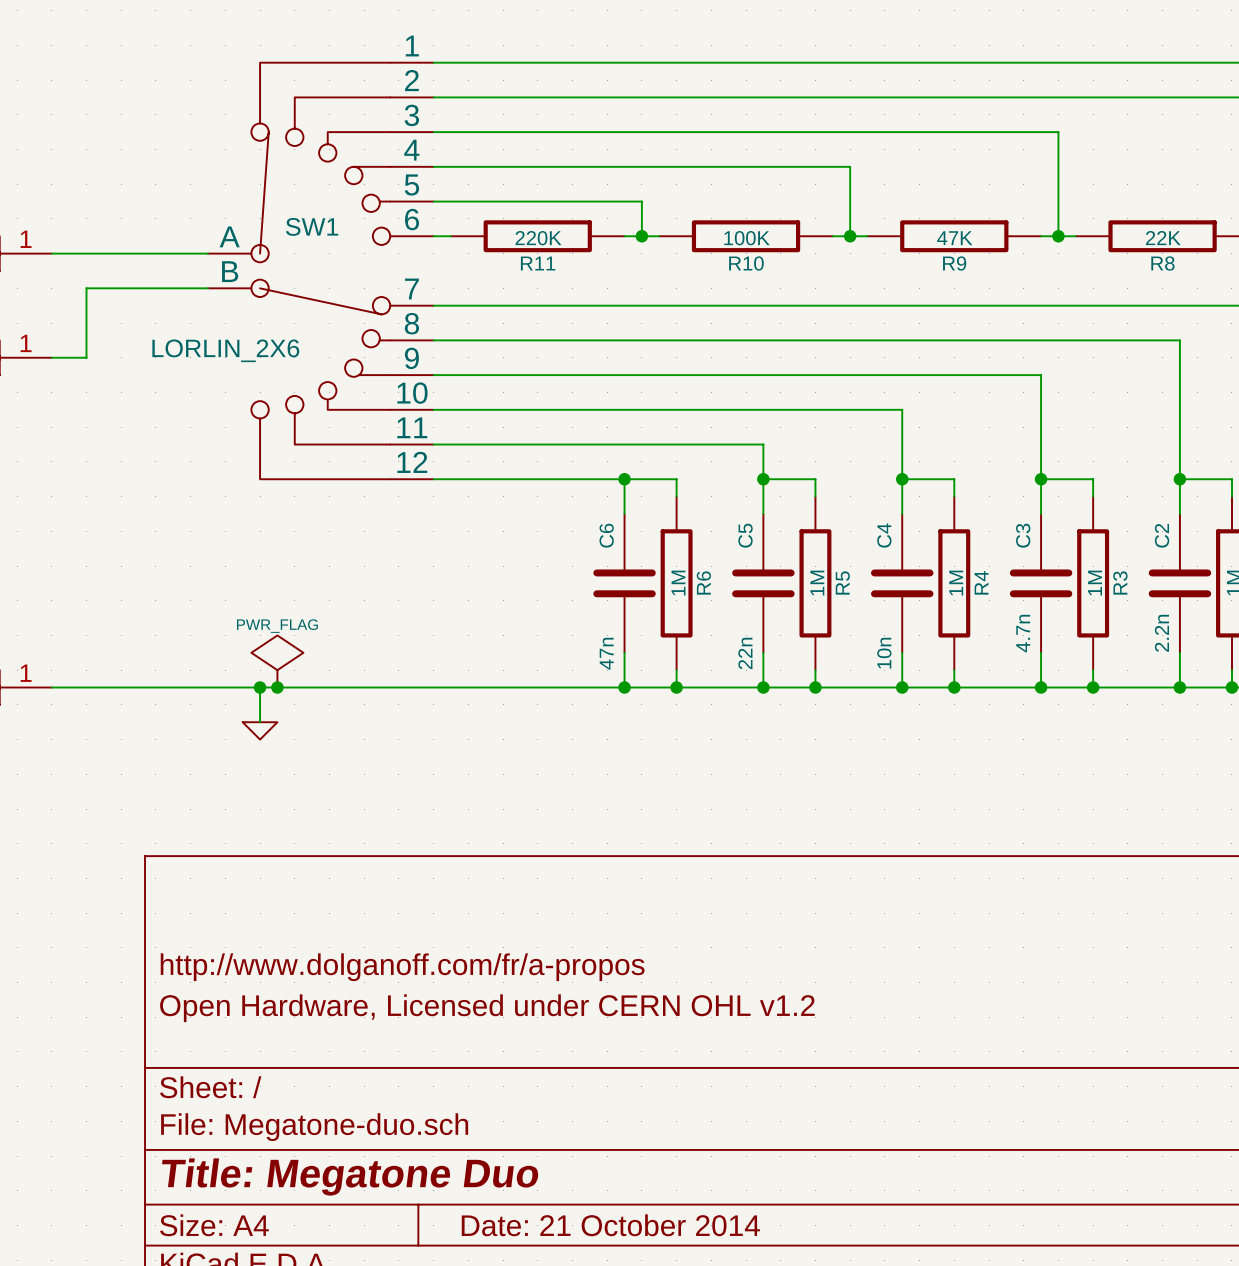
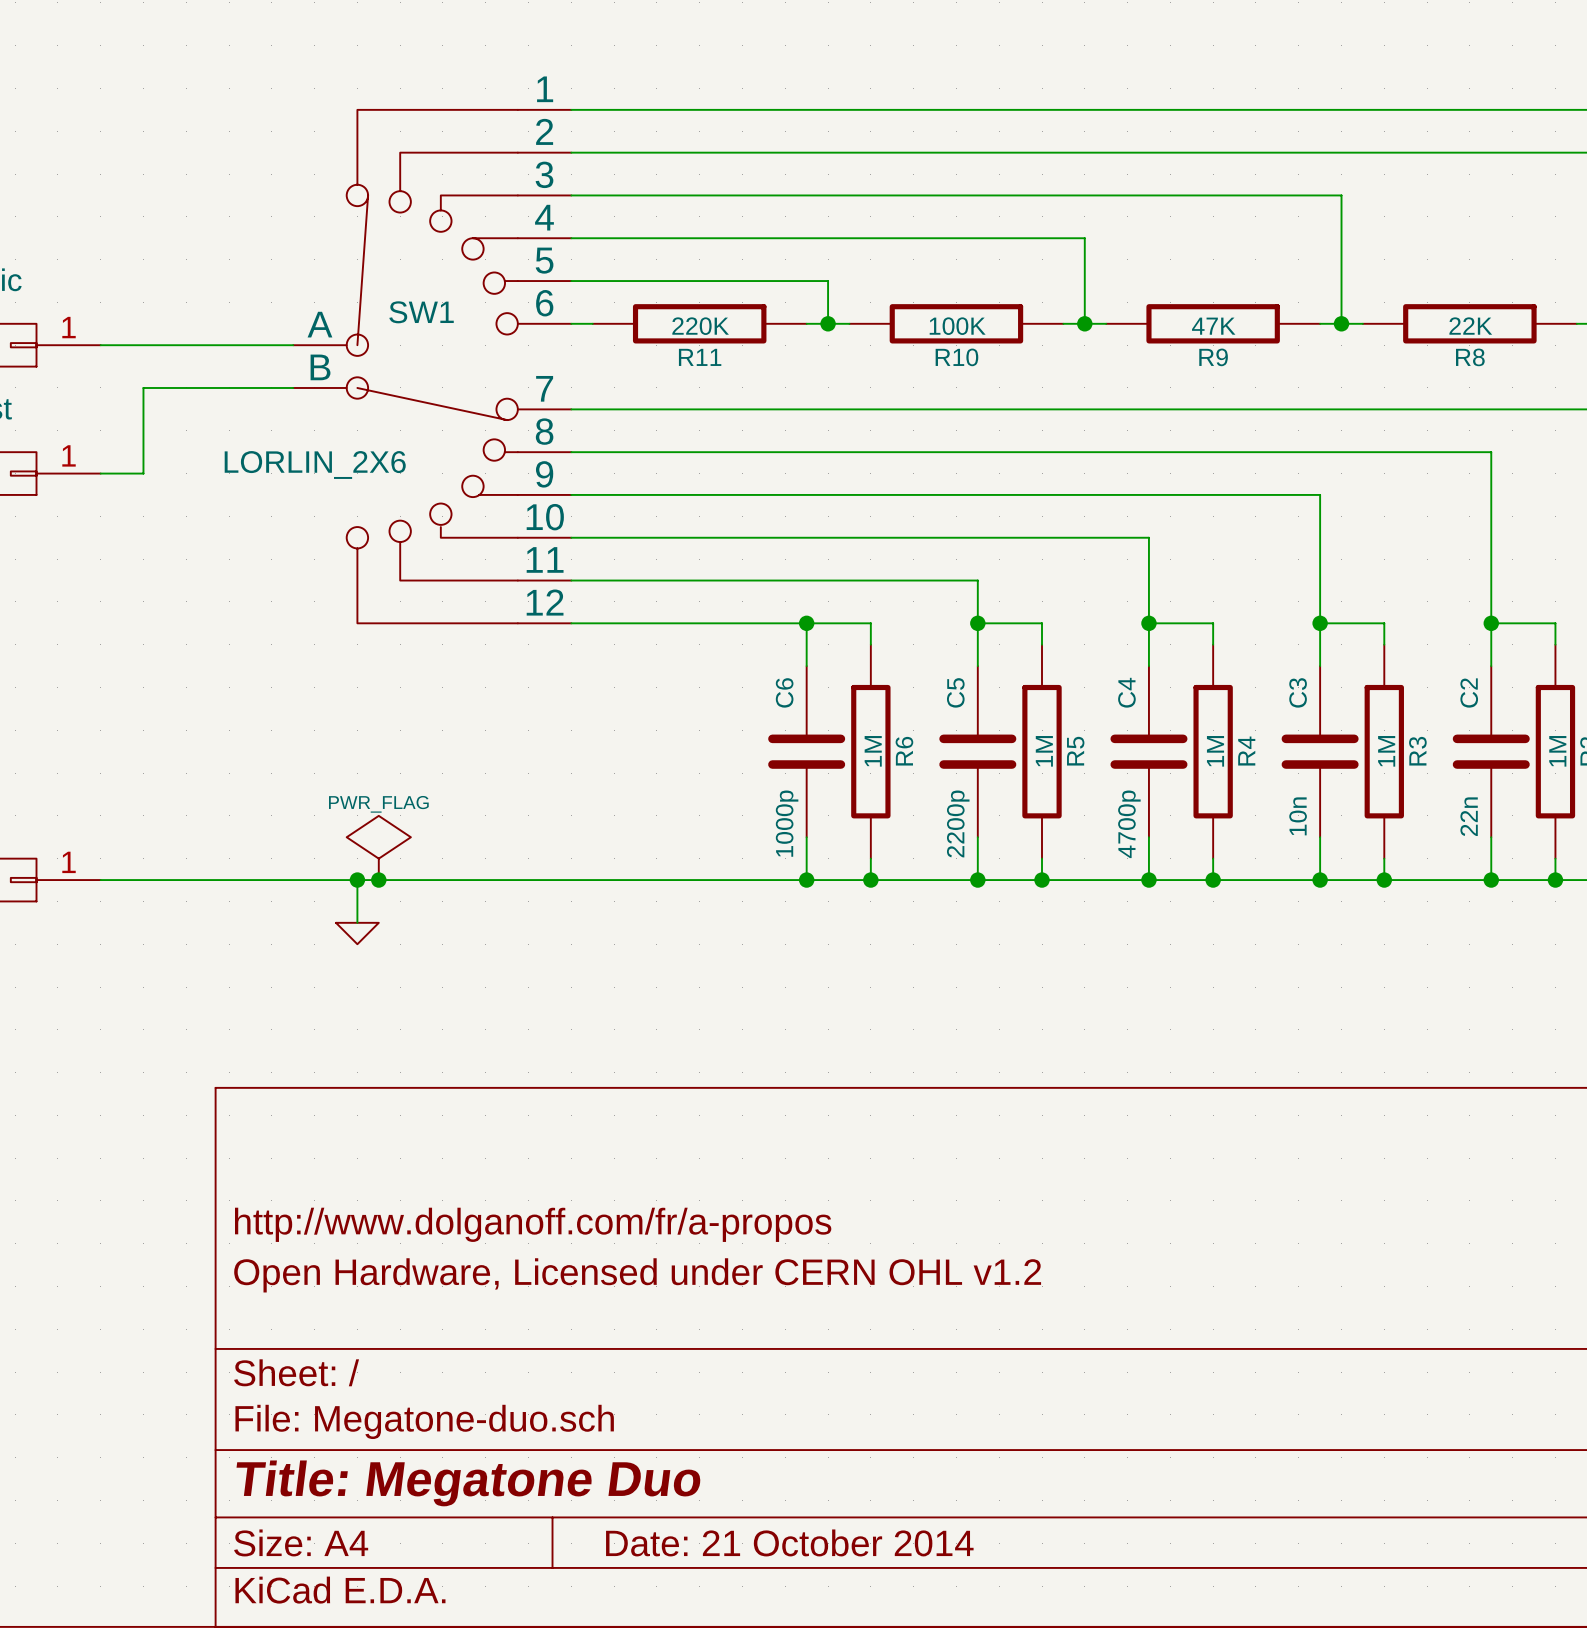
C3 value: 4.7n (1023, 633) -> 10n (1298, 816)
C2 value: 2.2n (1161, 633) -> 22n (1469, 816)
C6 value: 47n (606, 653) -> 1000p (787, 823)
C5 value: 22n (745, 653) -> 2200p (958, 823)
C4 value: 10n (884, 653) -> 4700p (1129, 824)

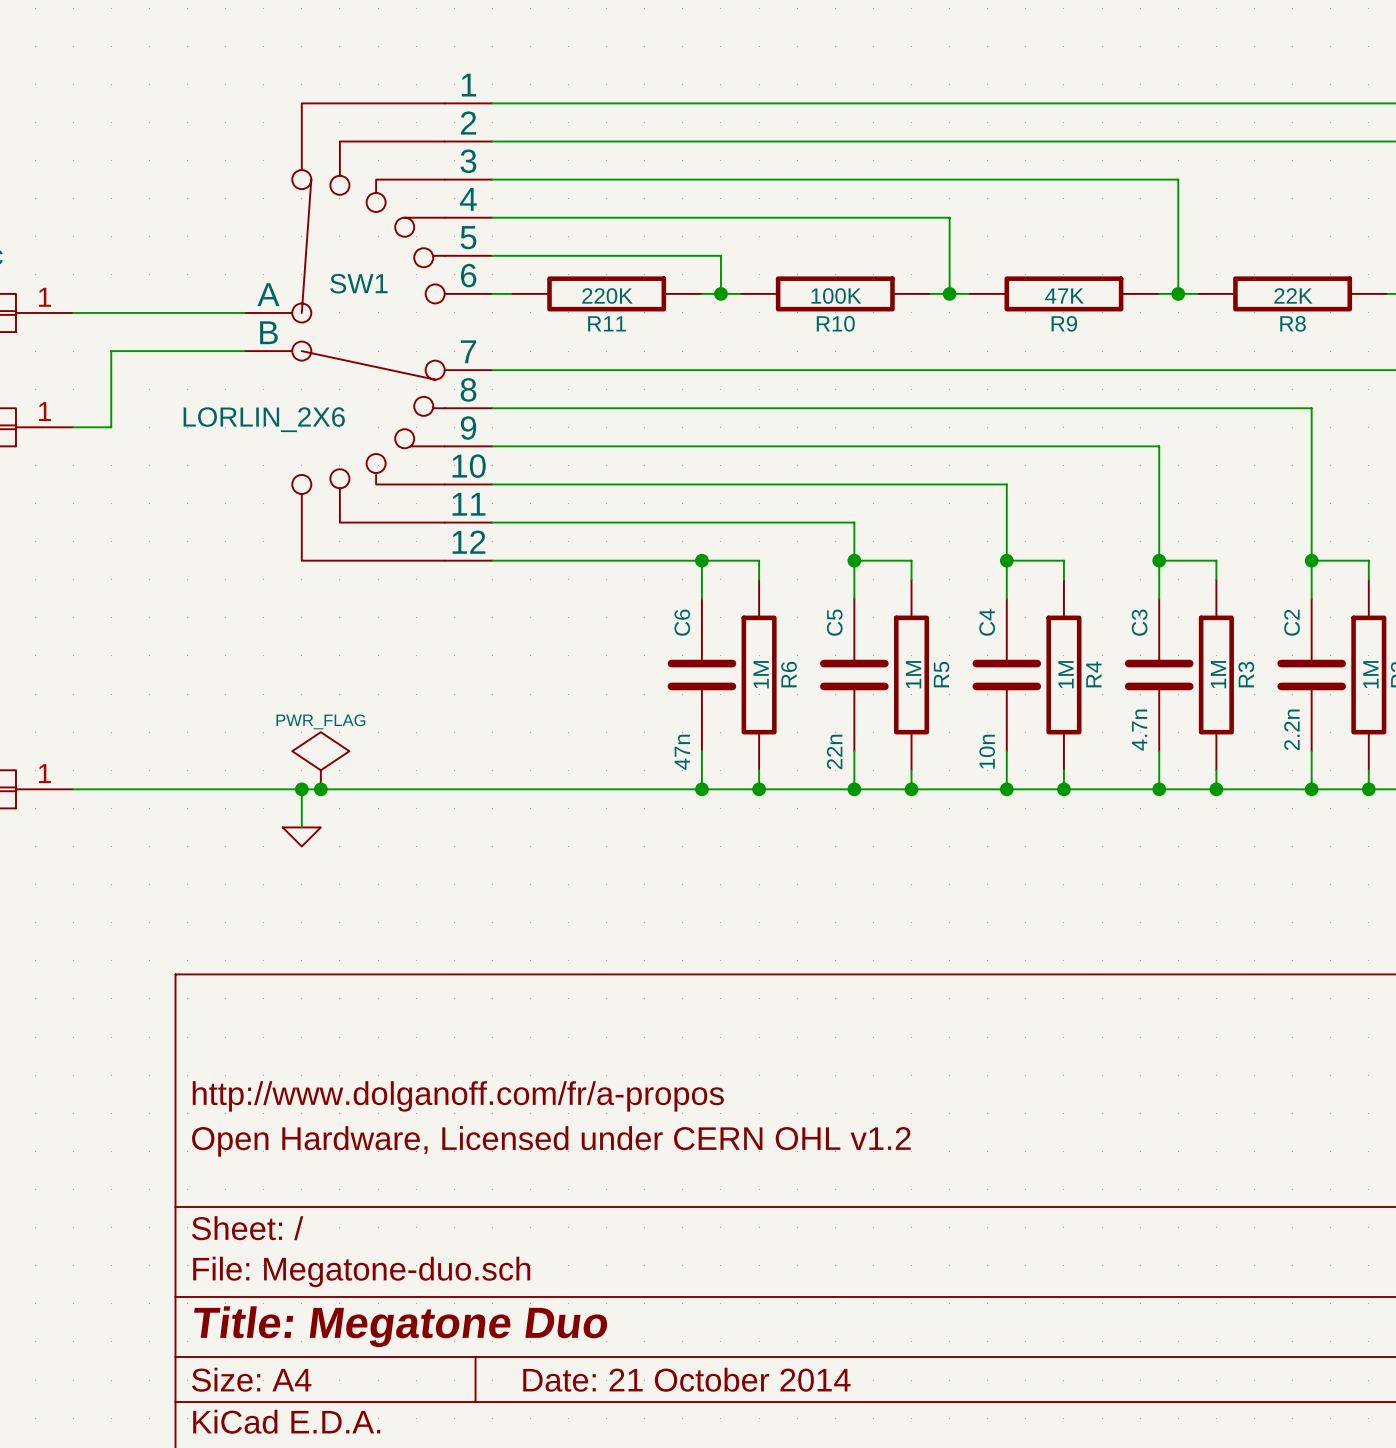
C3 value: 10n (1298, 816) -> 4.7n (1139, 730)
C2 value: 22n (1469, 816) -> 2.2n (1291, 729)
C6 value: 1000p (787, 823) -> 47n (682, 752)
C5 value: 2200p (958, 823) -> 22n (834, 751)
C4 value: 4700p (1129, 824) -> 10n (987, 751)

